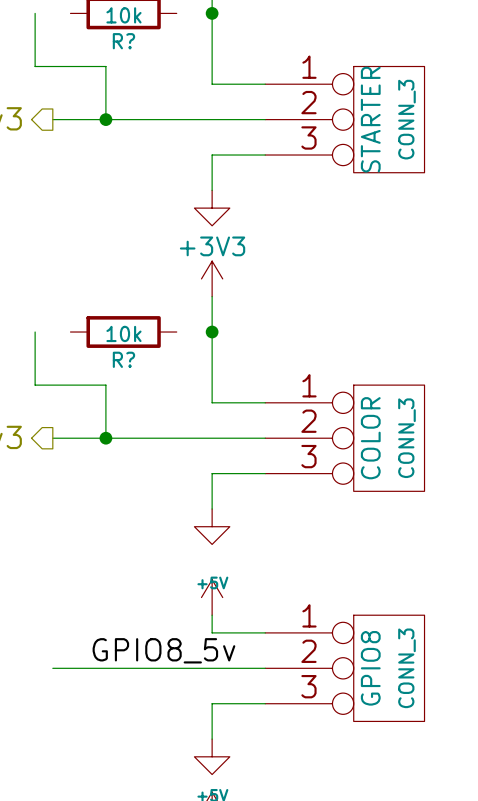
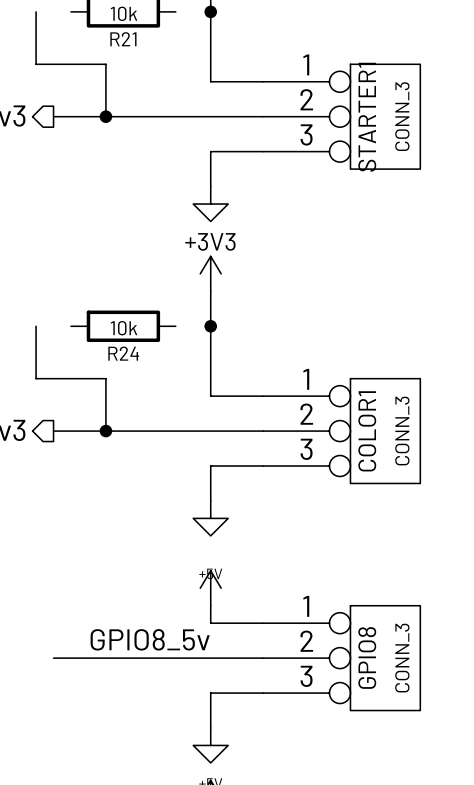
R? name: R? (123, 41) -> R21 (123, 39)
STARTER name: STARTER (370, 119) -> STARTER1 (367, 117)
R? name: R? (123, 359) -> R24 (123, 353)
COLOR name: COLOR (370, 438) -> COLOR1 (367, 431)

